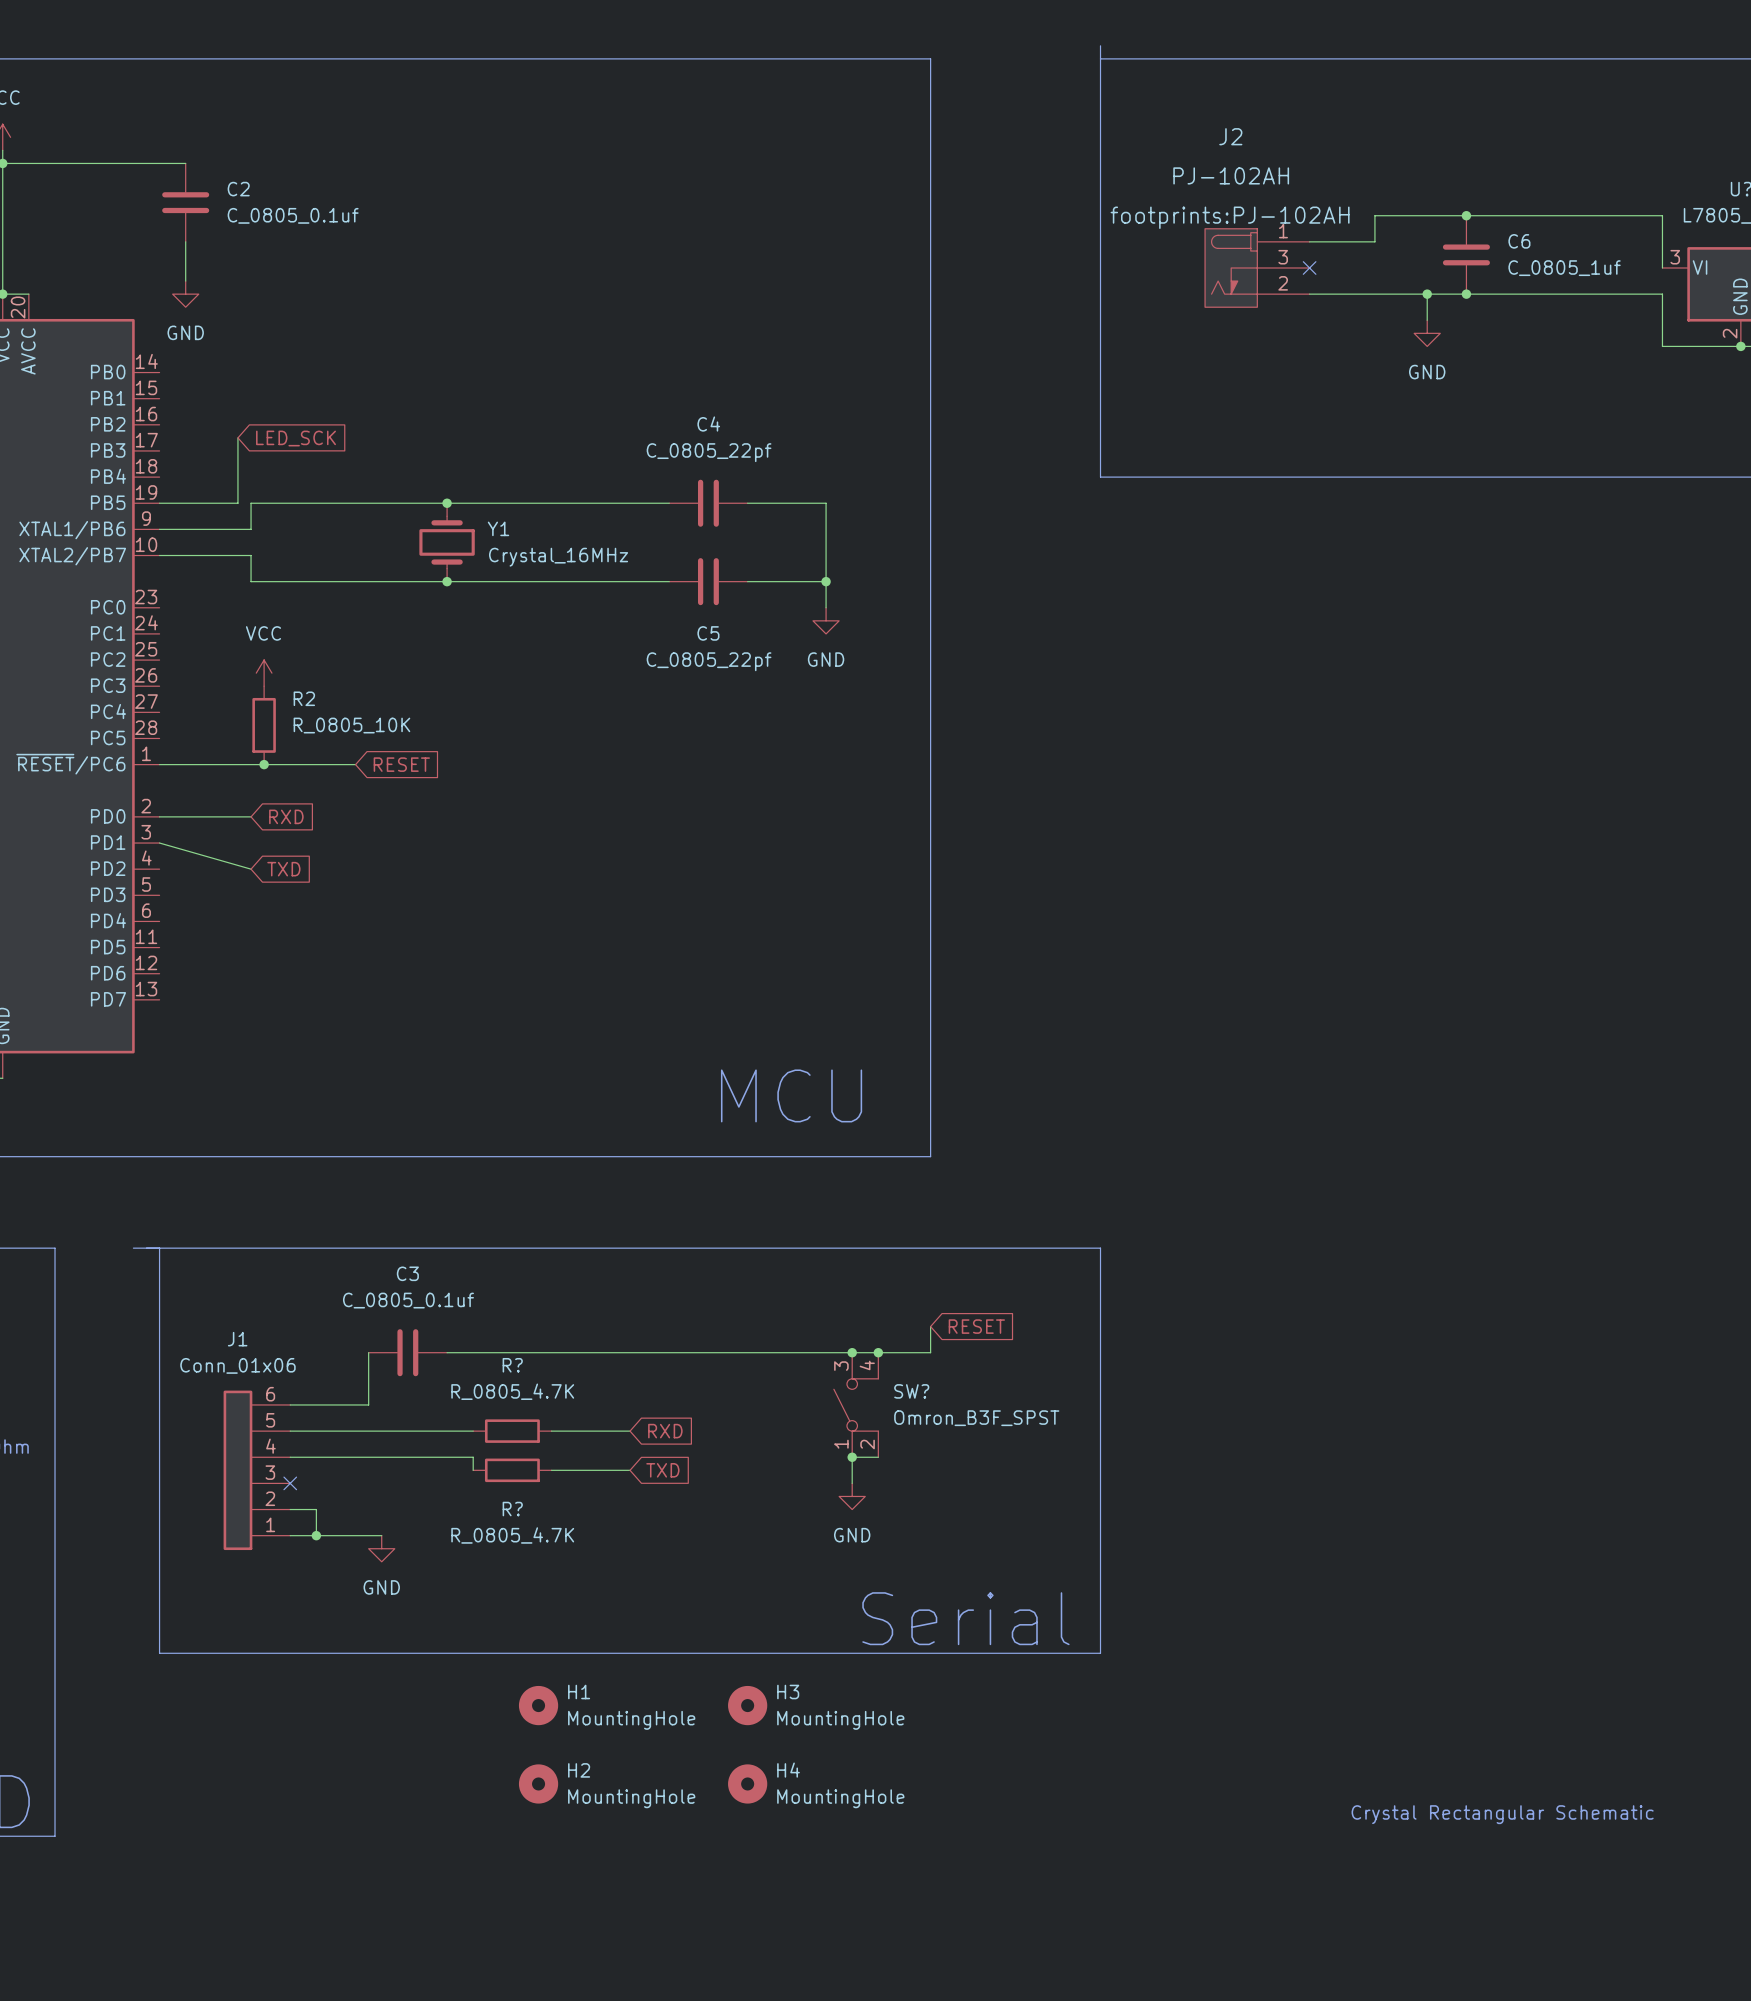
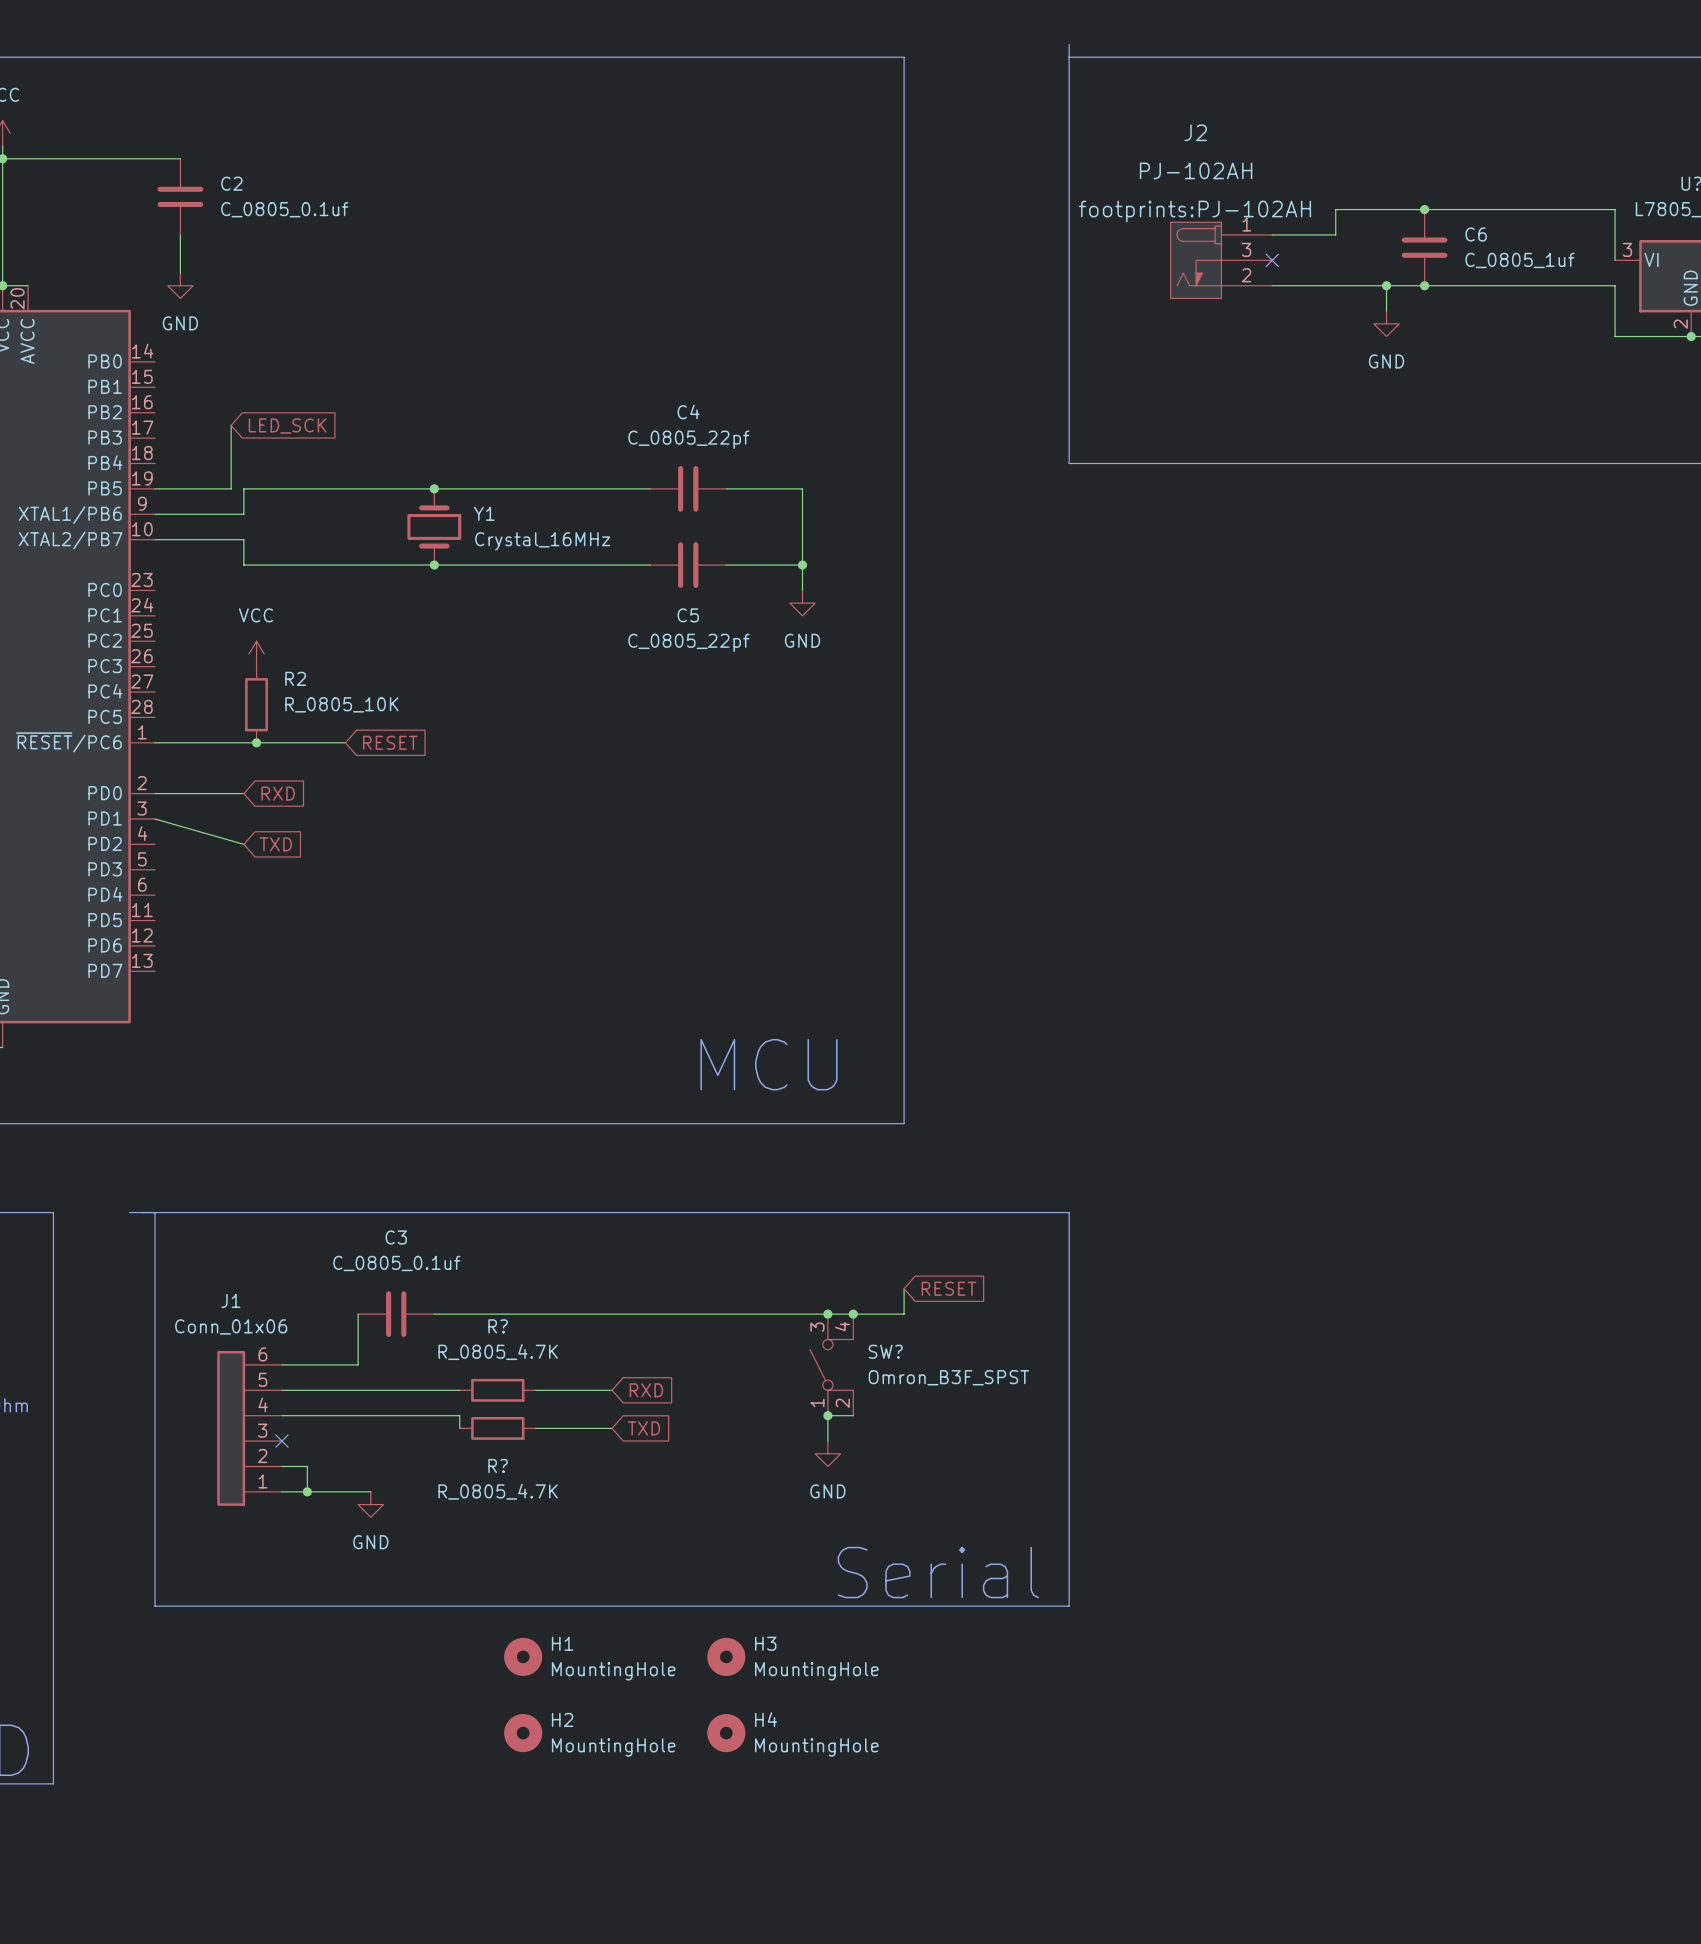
text: Crystal Rectangular Schematic (1502, 1814) -> none

